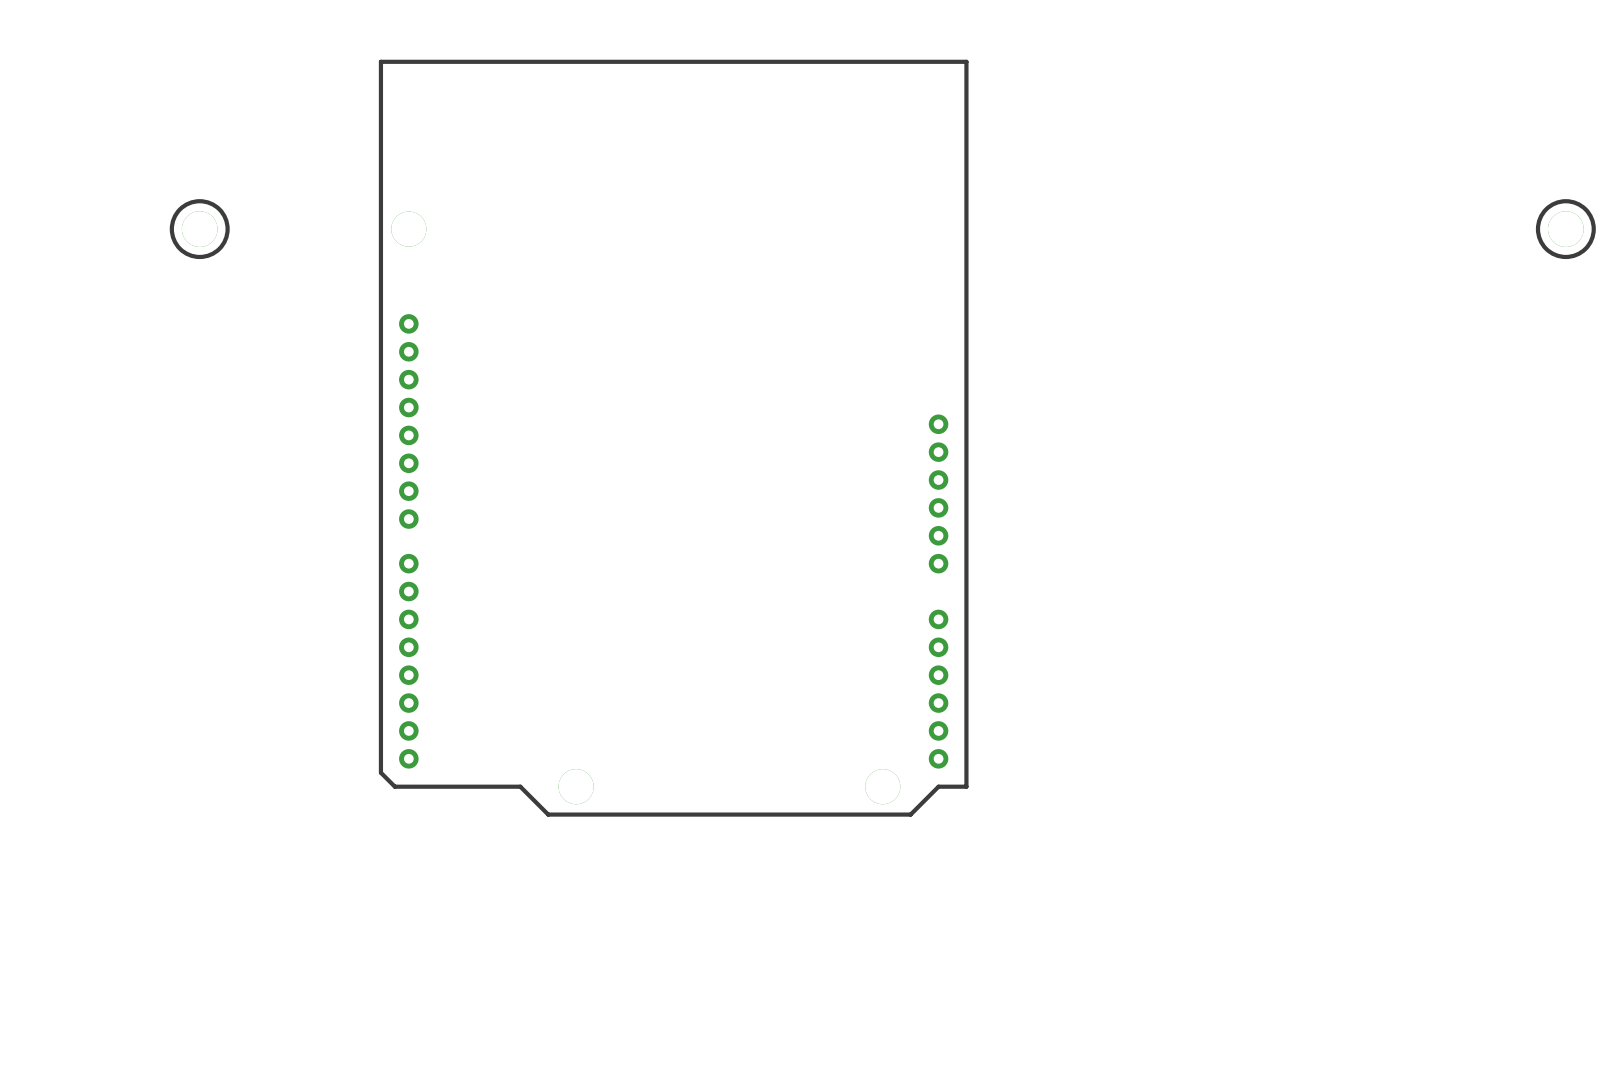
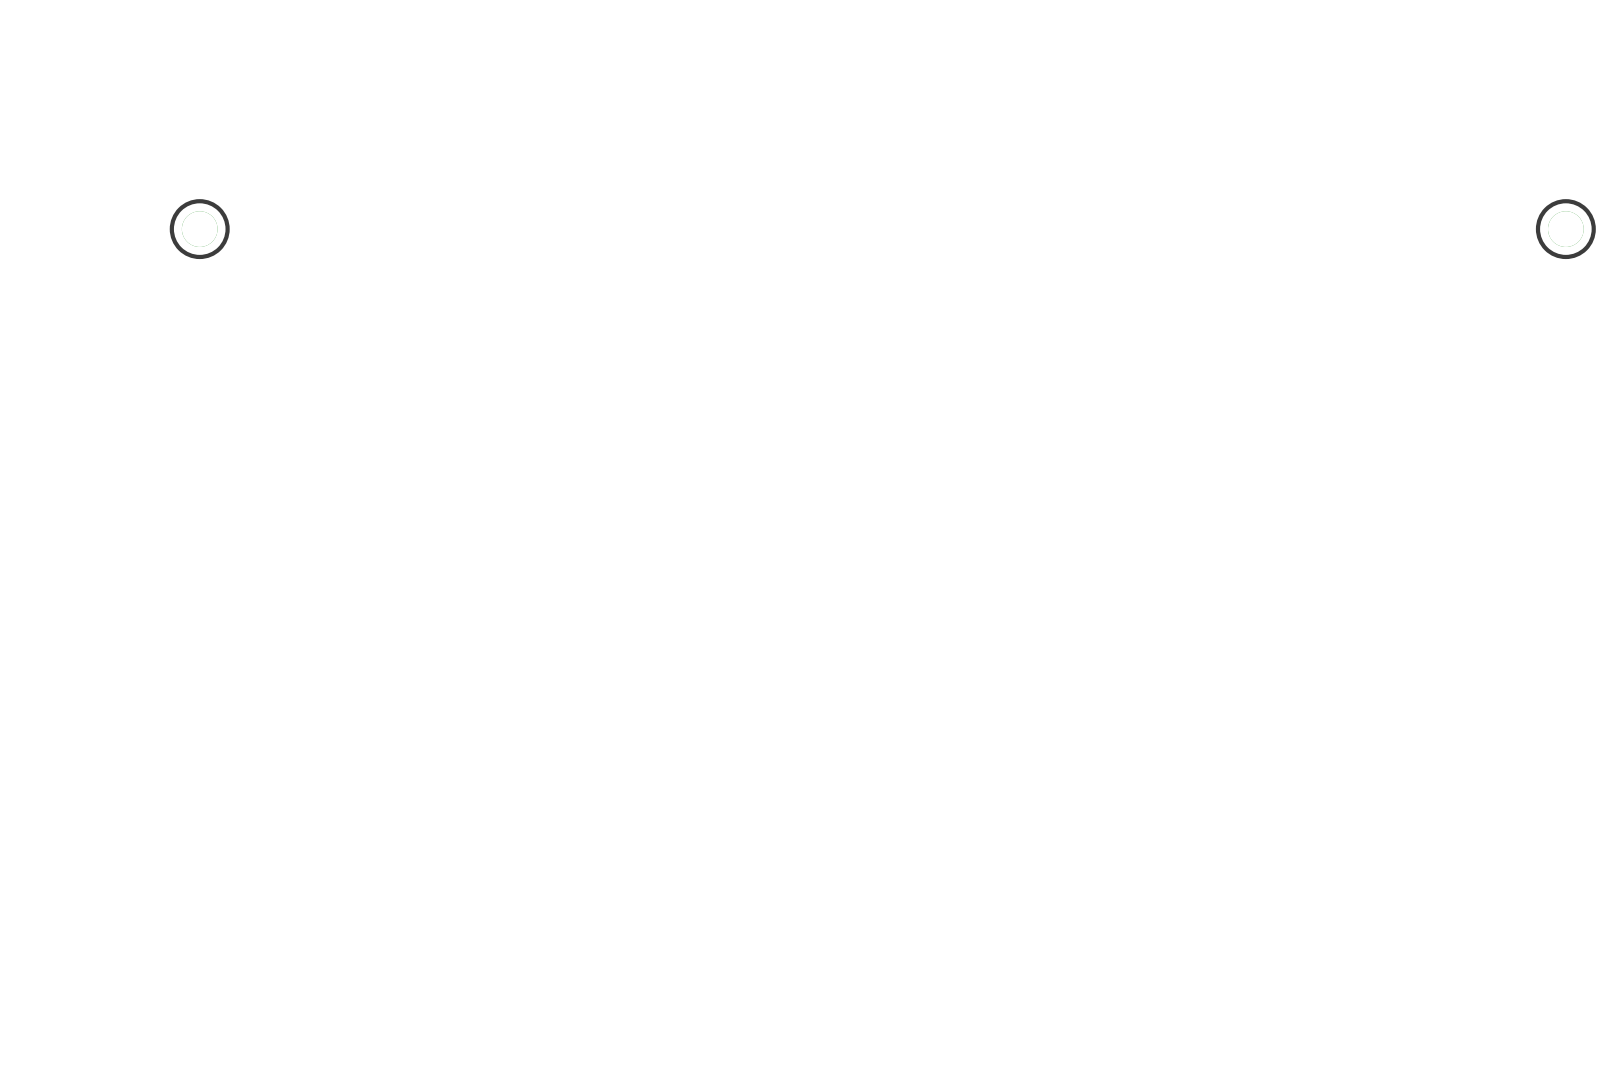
part: (673, 438) -> none

